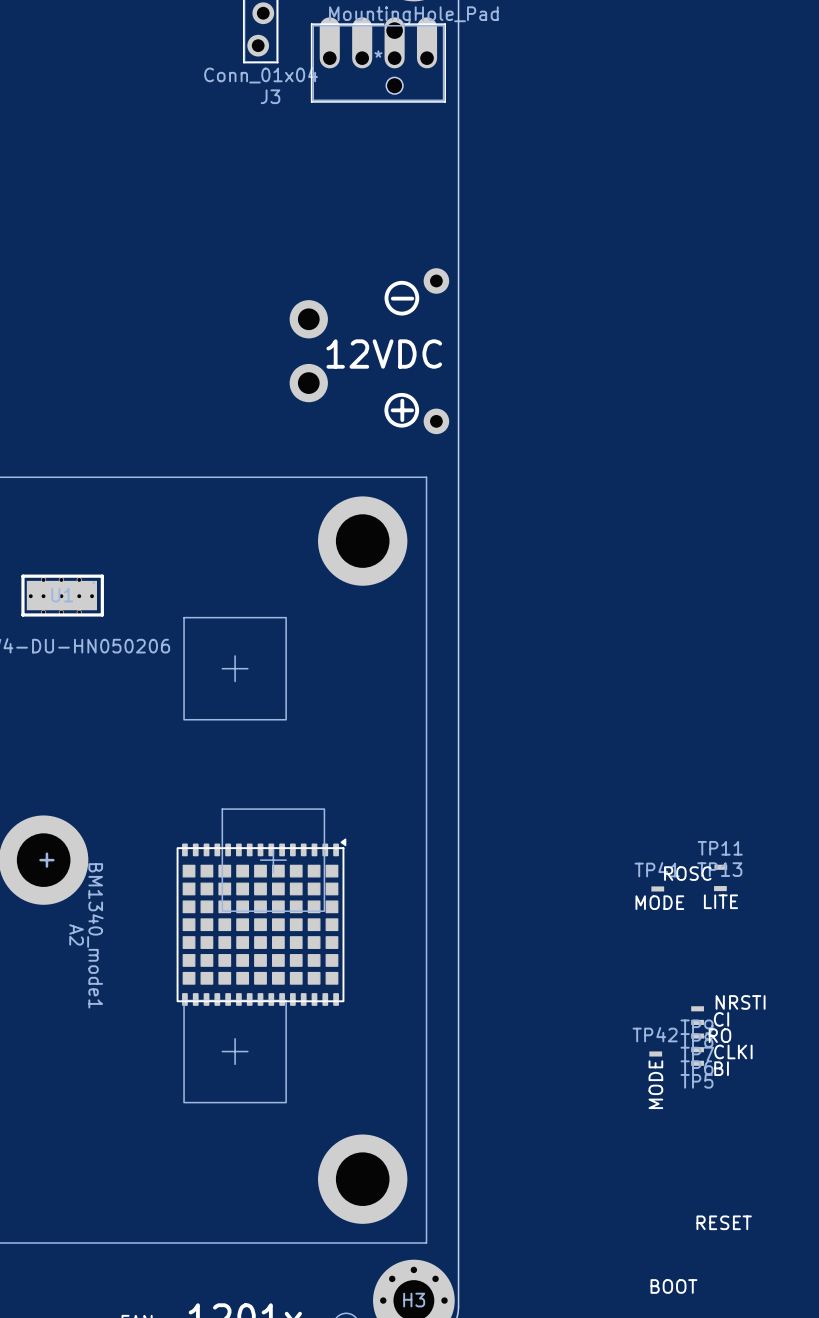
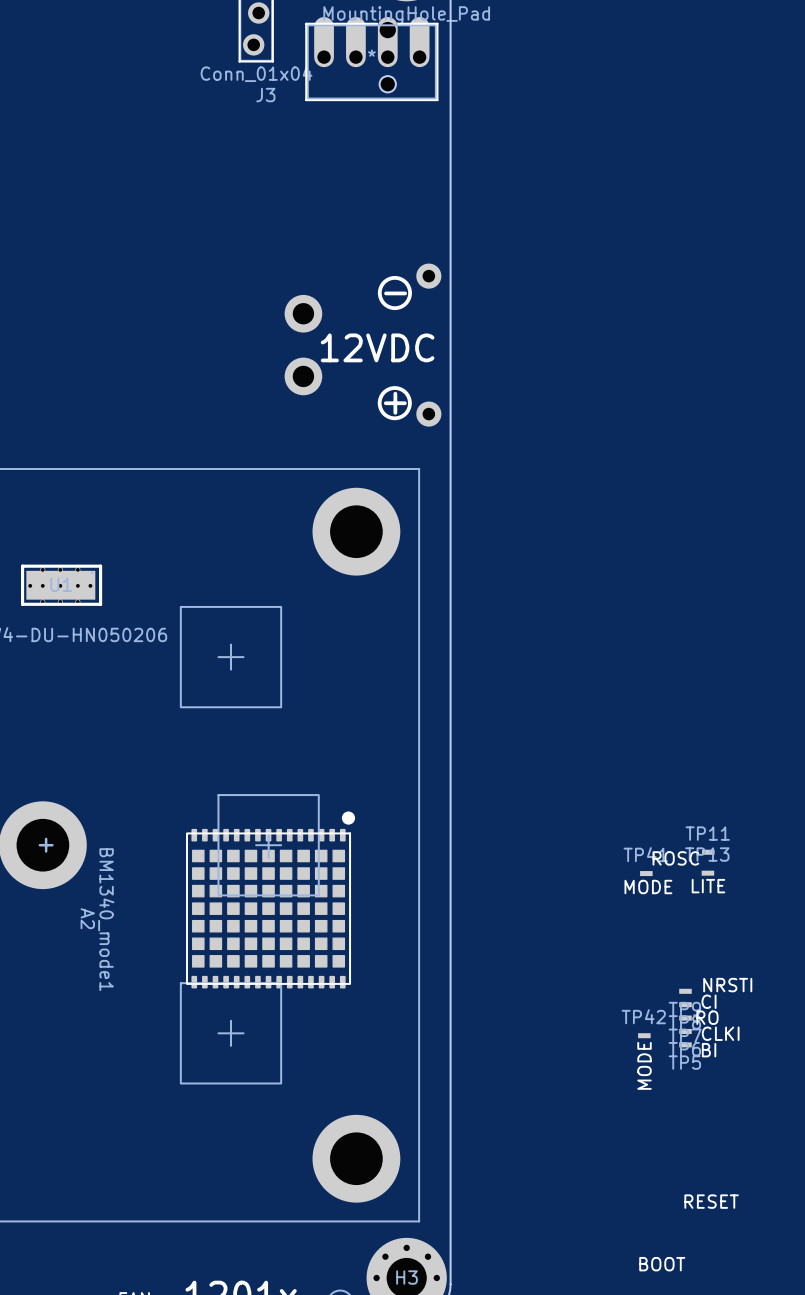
A2 footprint: [176, 838, 347, 1006] -> [186, 811, 356, 989]

